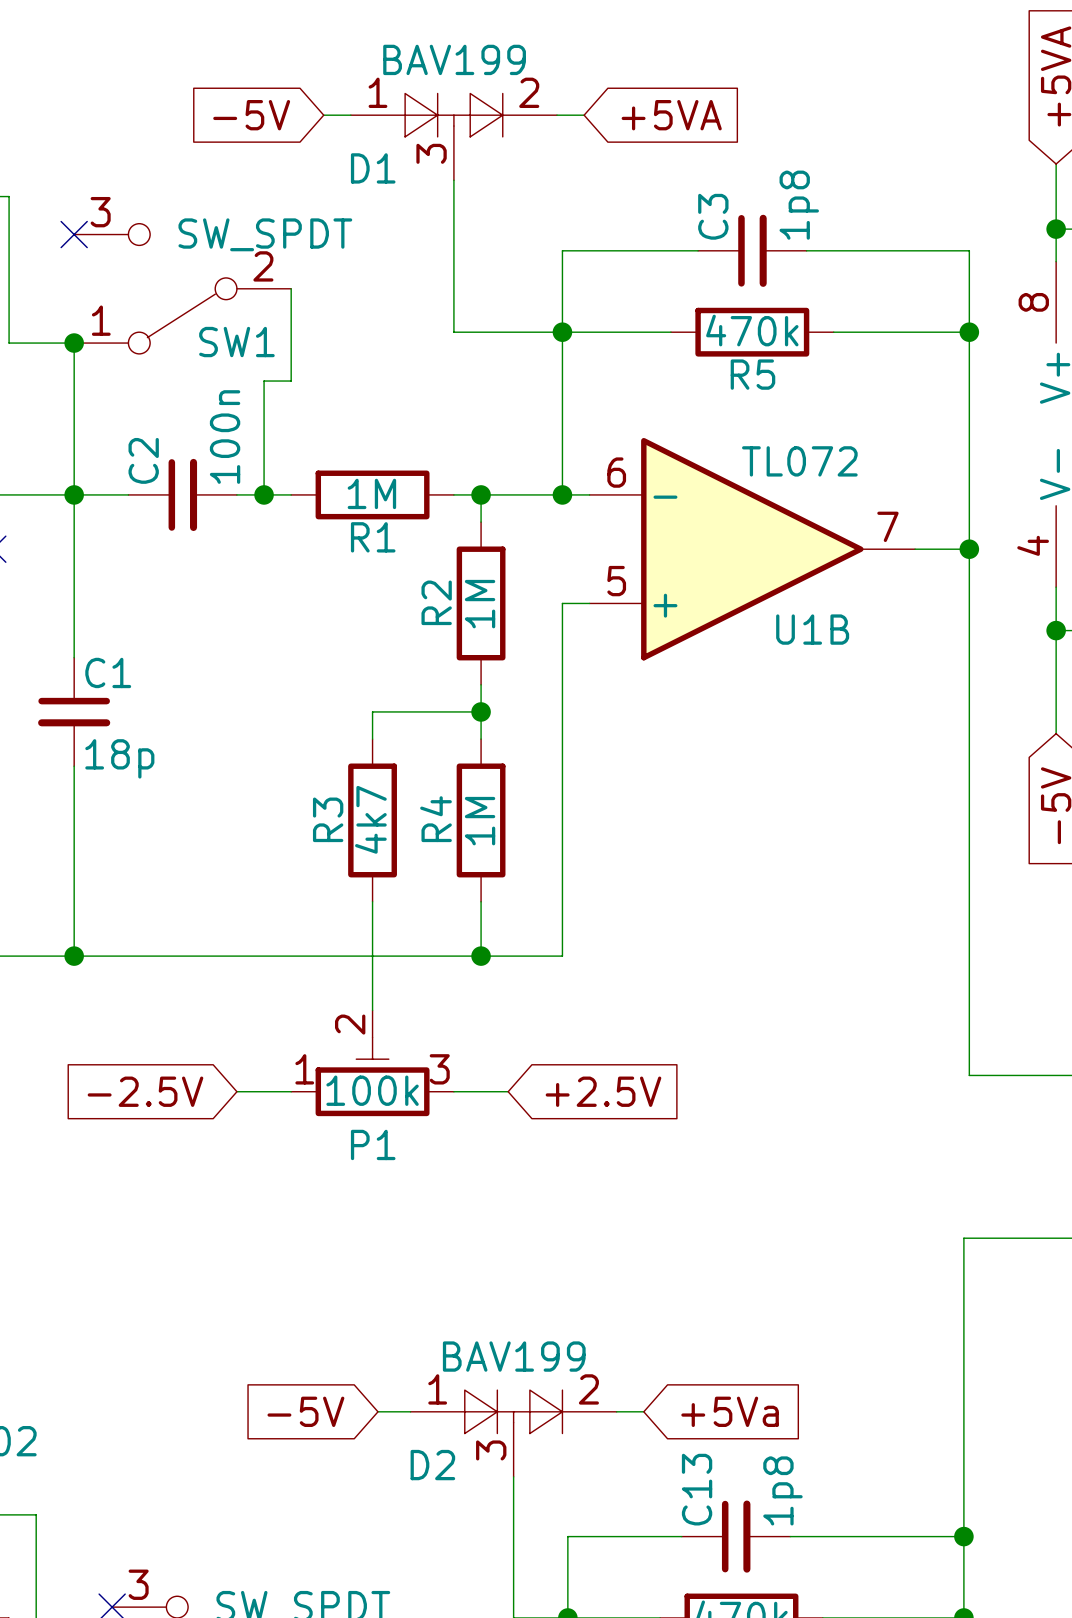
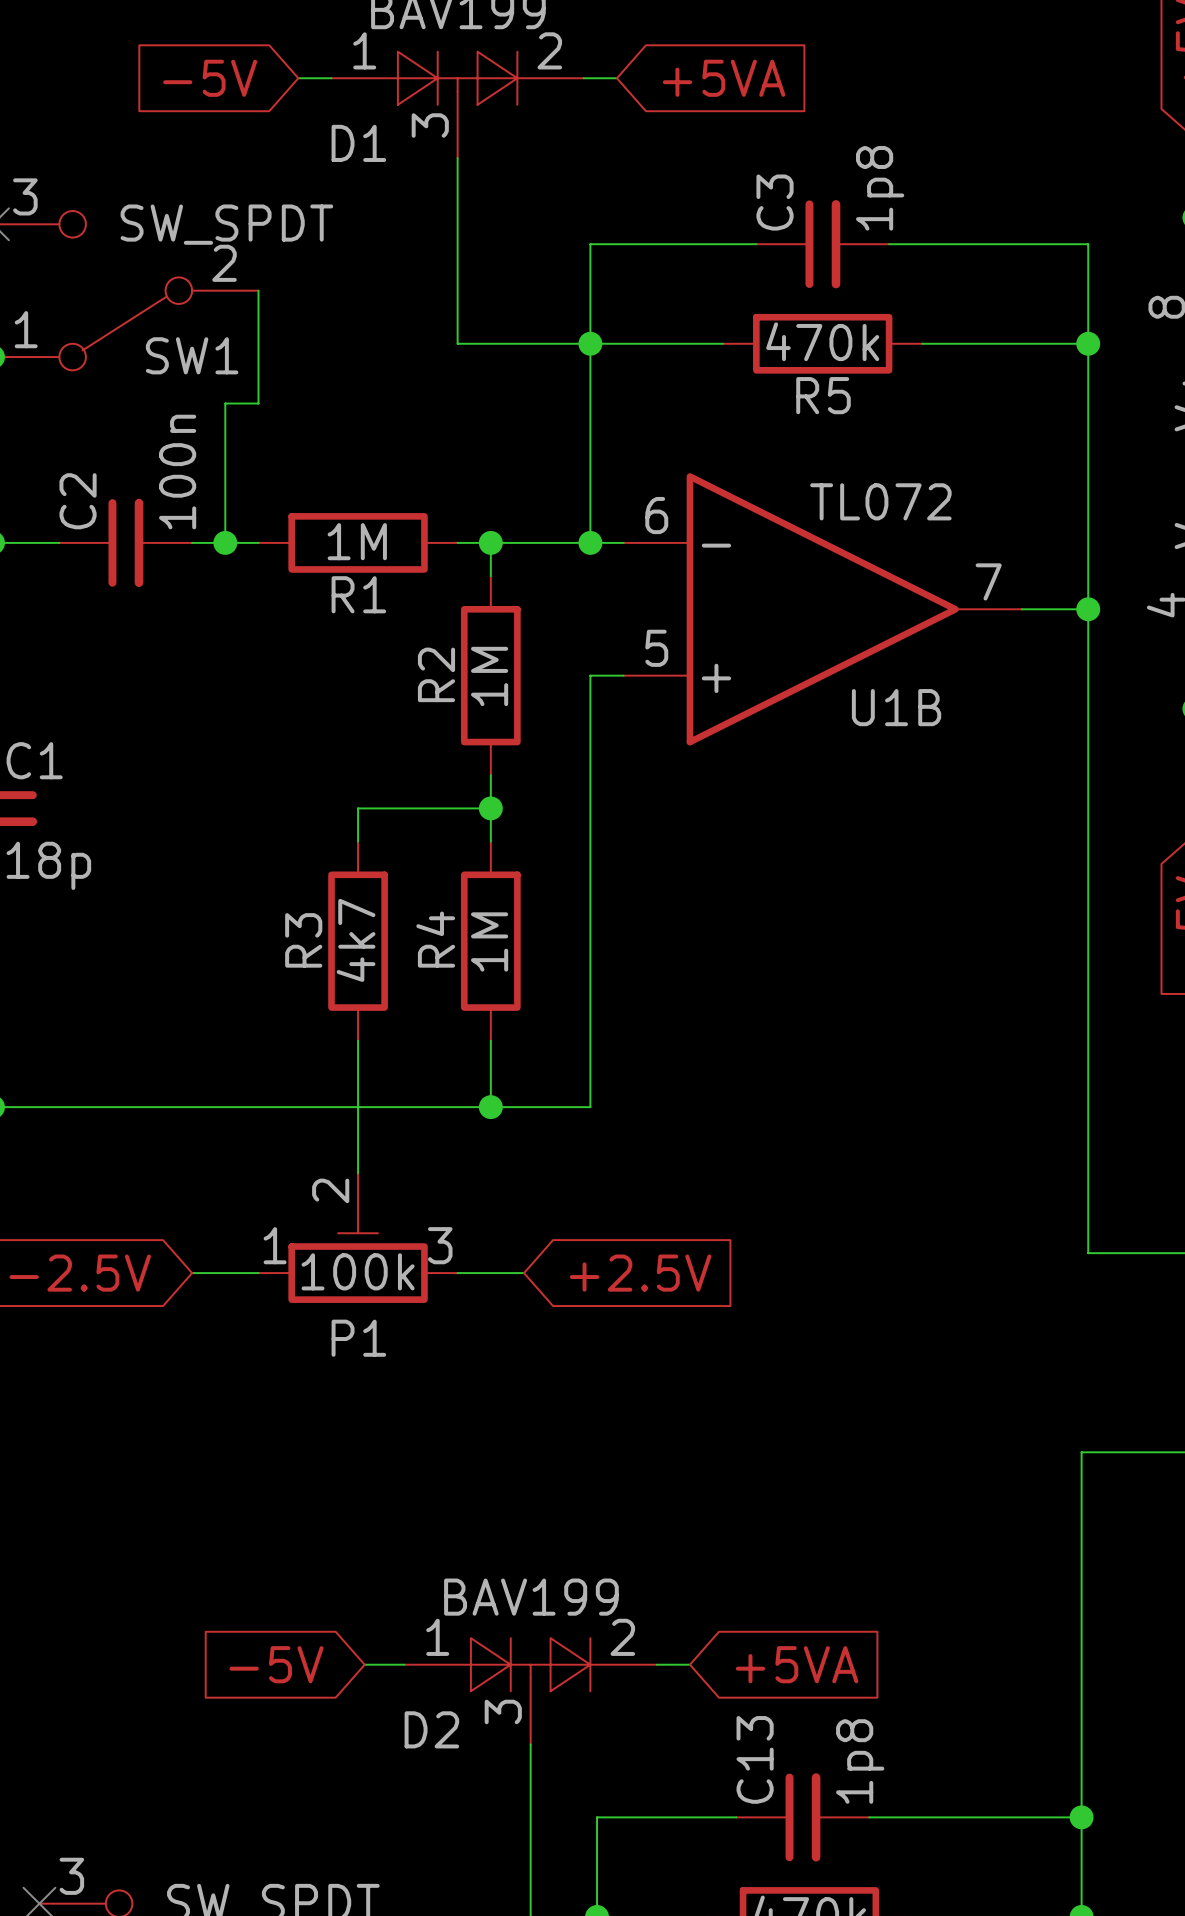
global label: +5Va (730, 1411) -> +5VA (797, 1664)

